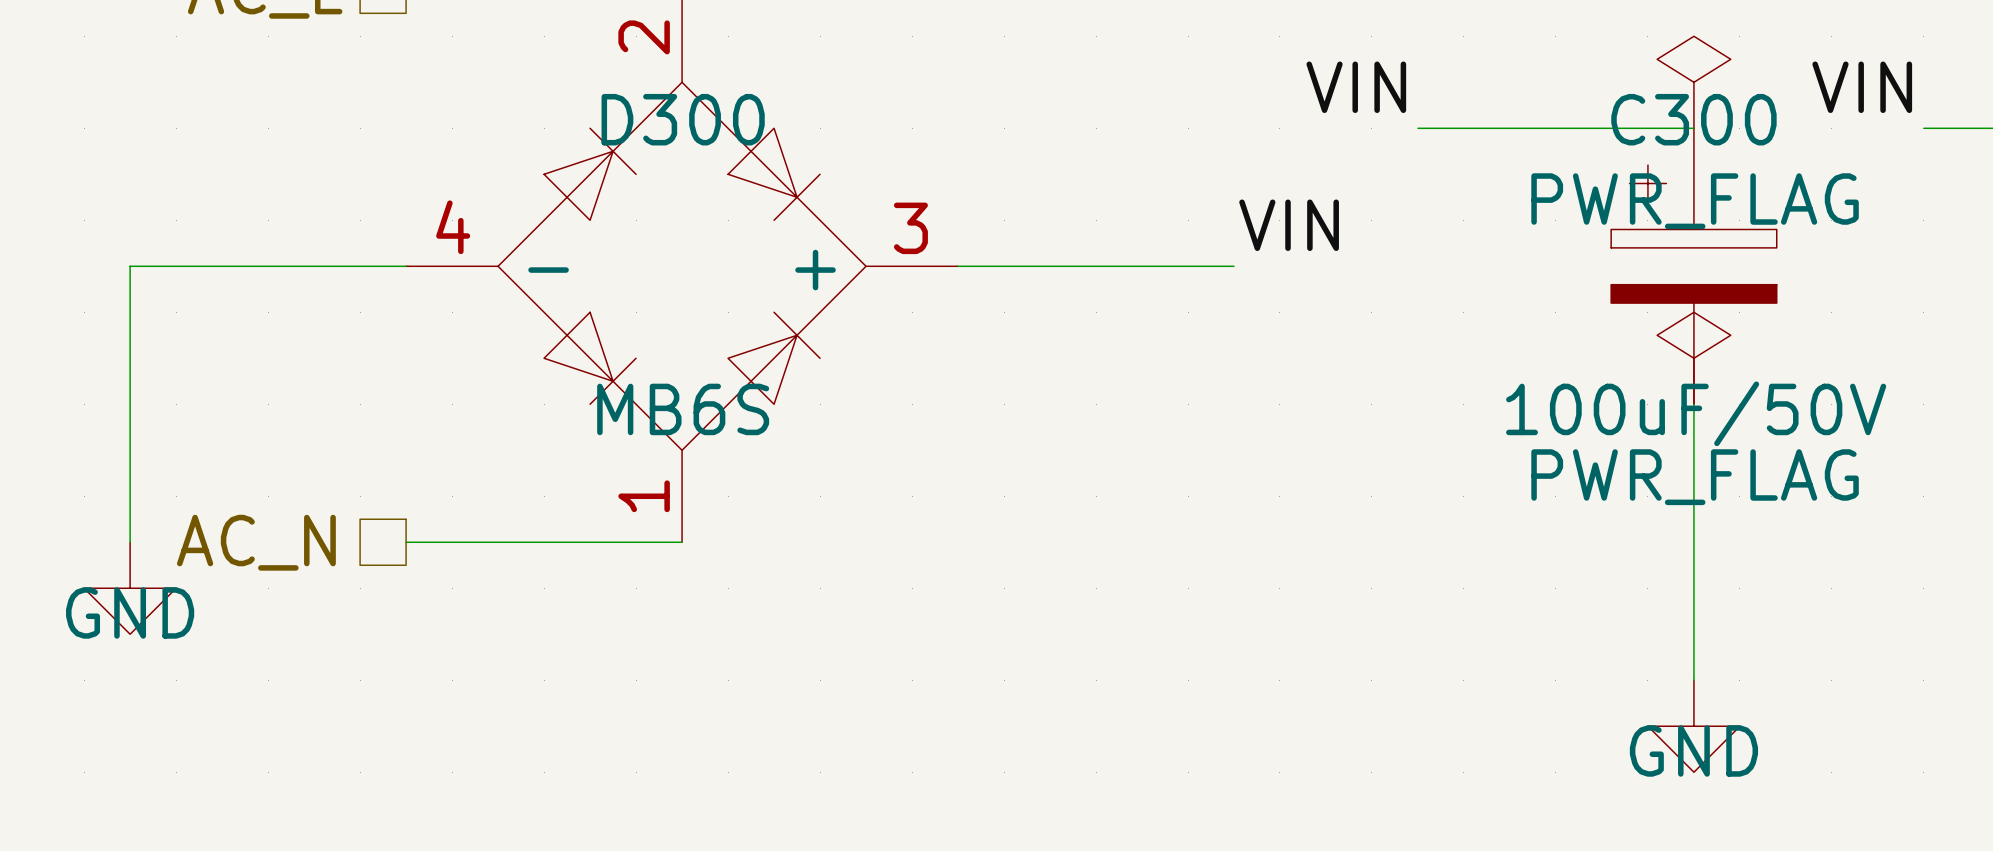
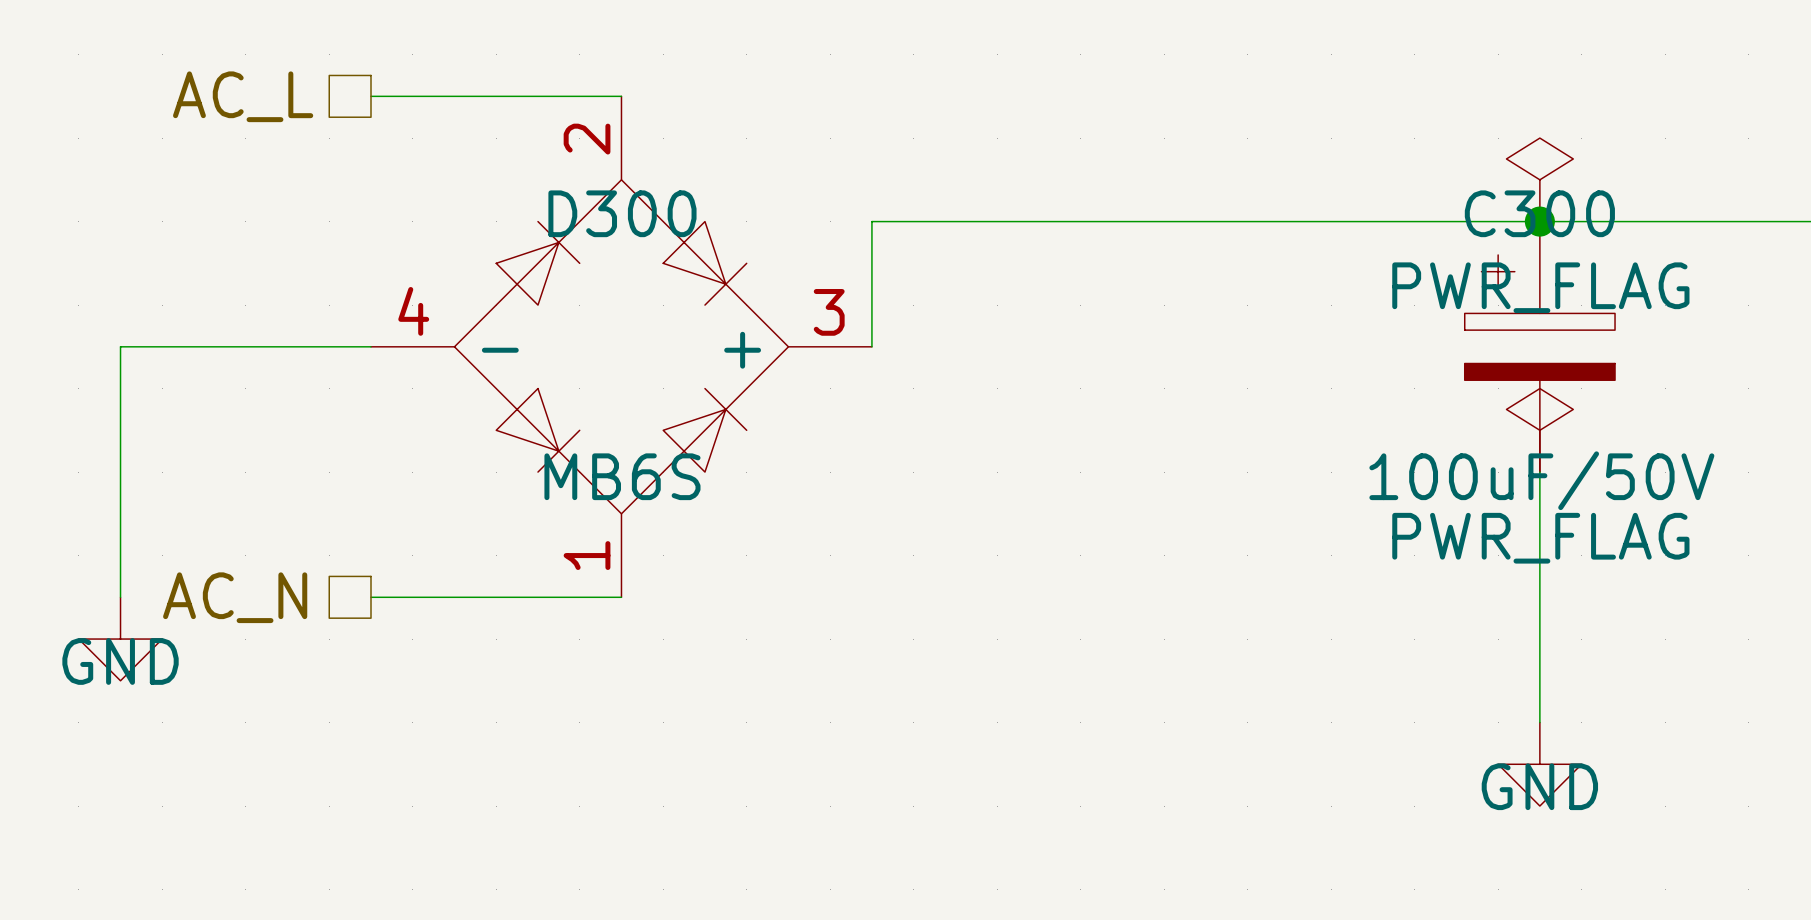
label: VIN (1356, 87) -> none
label: VIN (1862, 87) -> none
wire: none -> (1539, 221) (1748, 221)
junction: none -> (1539, 221)
label: VIN (1289, 225) -> none
wire: (958, 266) (1234, 266) -> (871, 346) (871, 221) (1289, 221)

